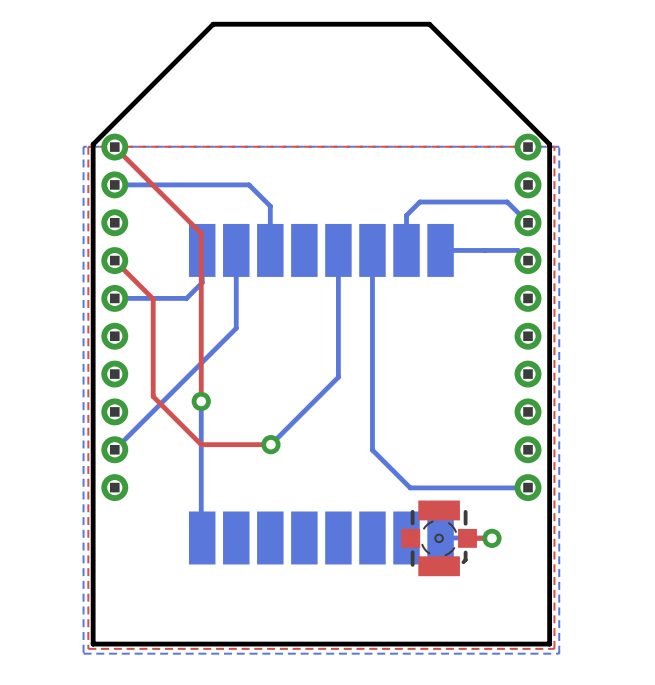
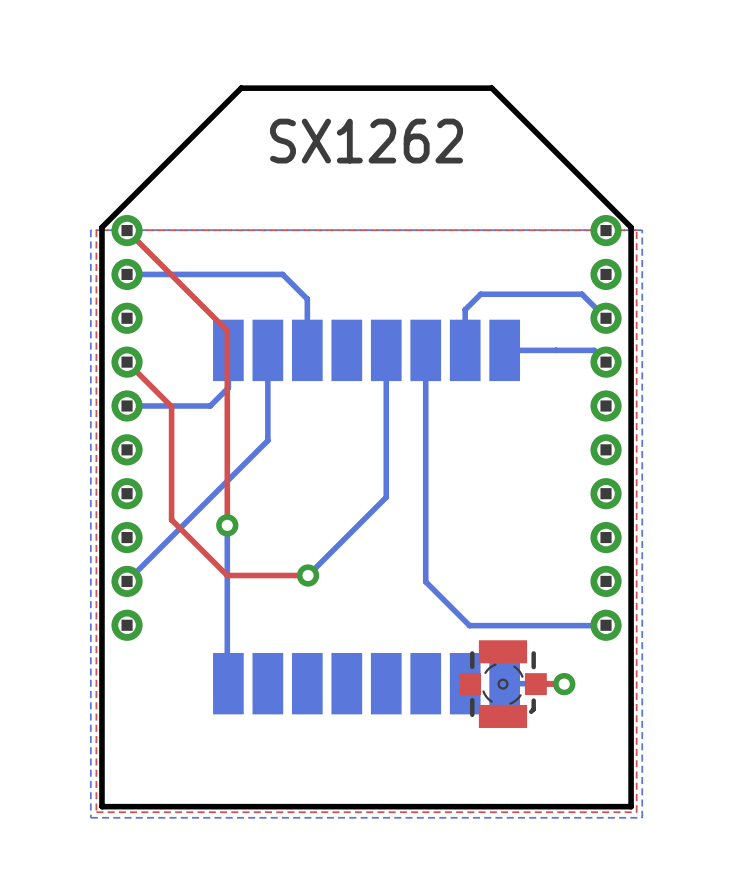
text: none -> SX1262 (366, 141)

